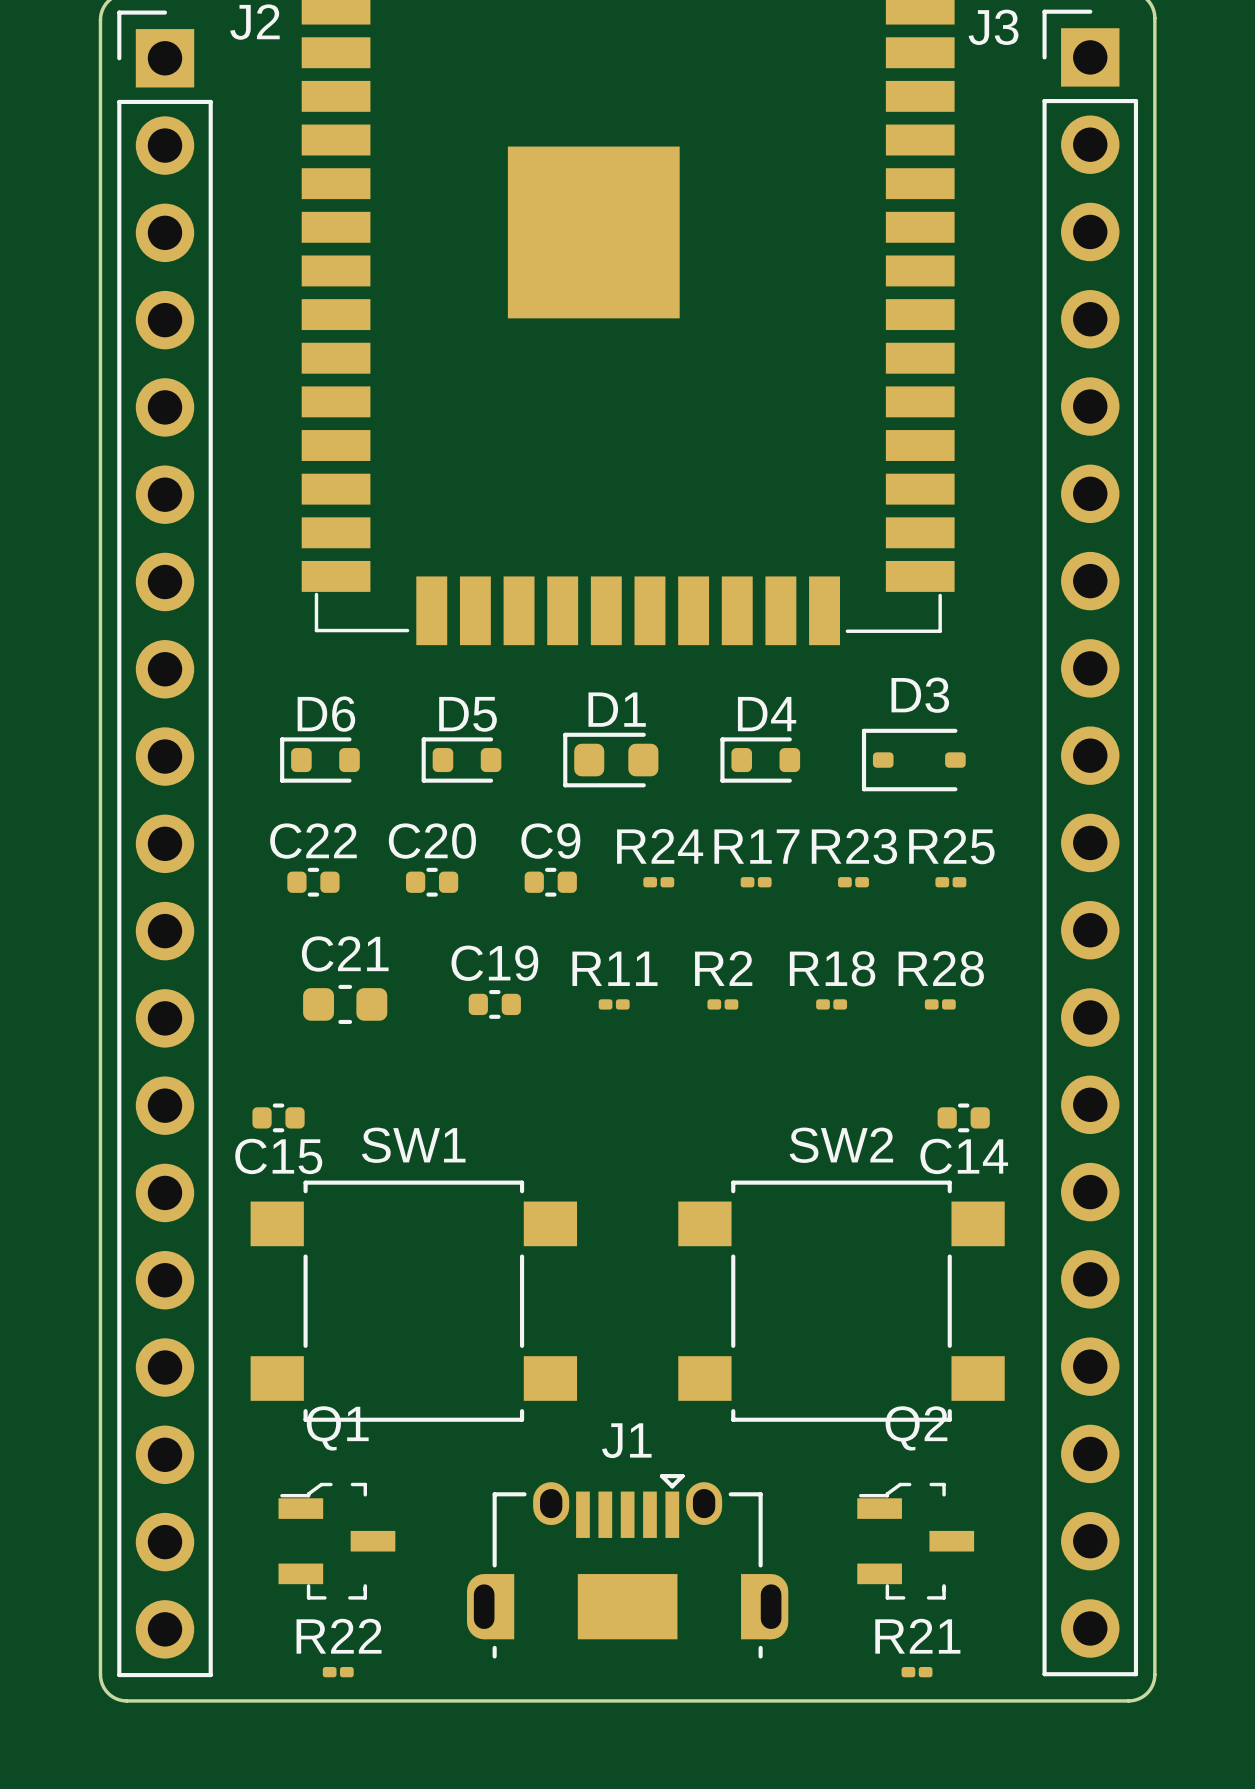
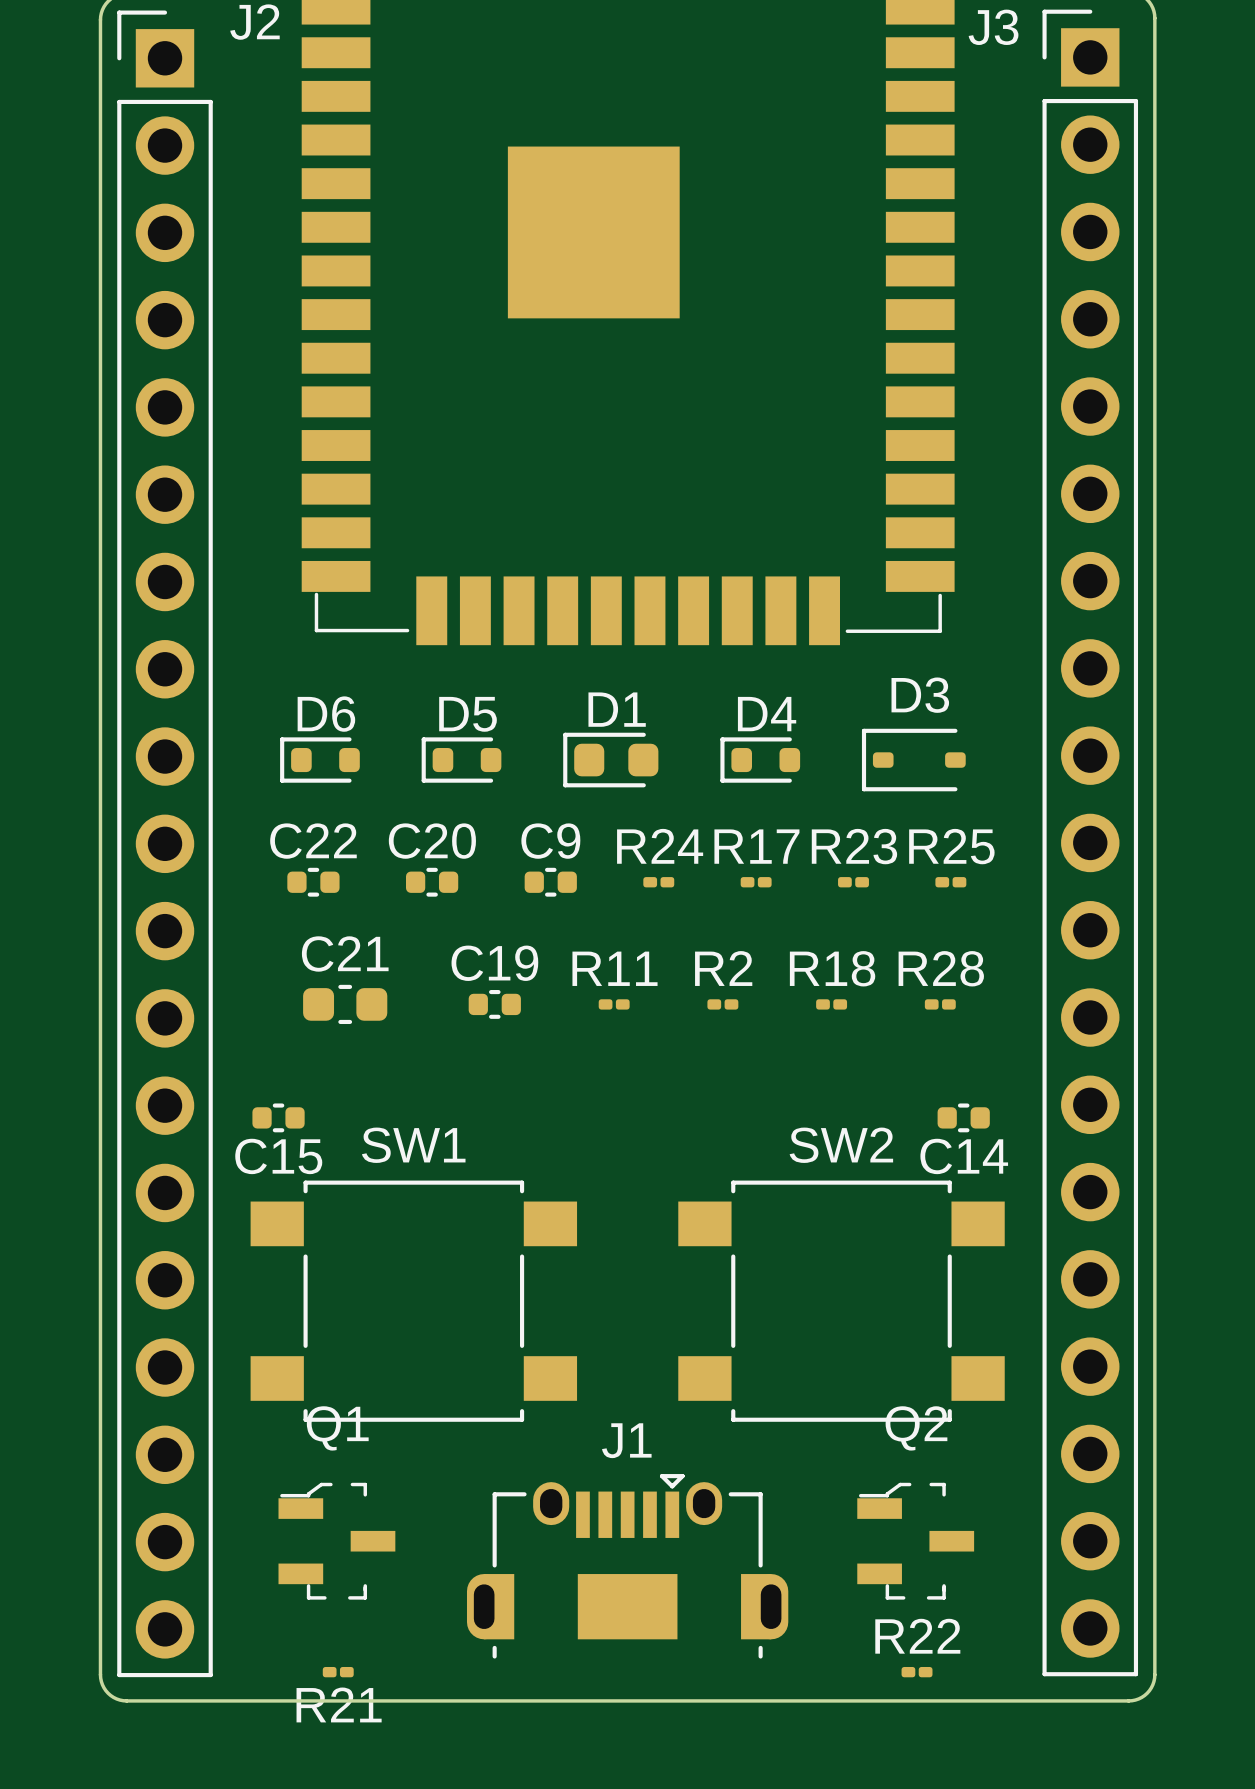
R22 name: R22 (339, 1636) -> R21 (339, 1704)
R21 name: R21 (917, 1636) -> R22 (917, 1636)

